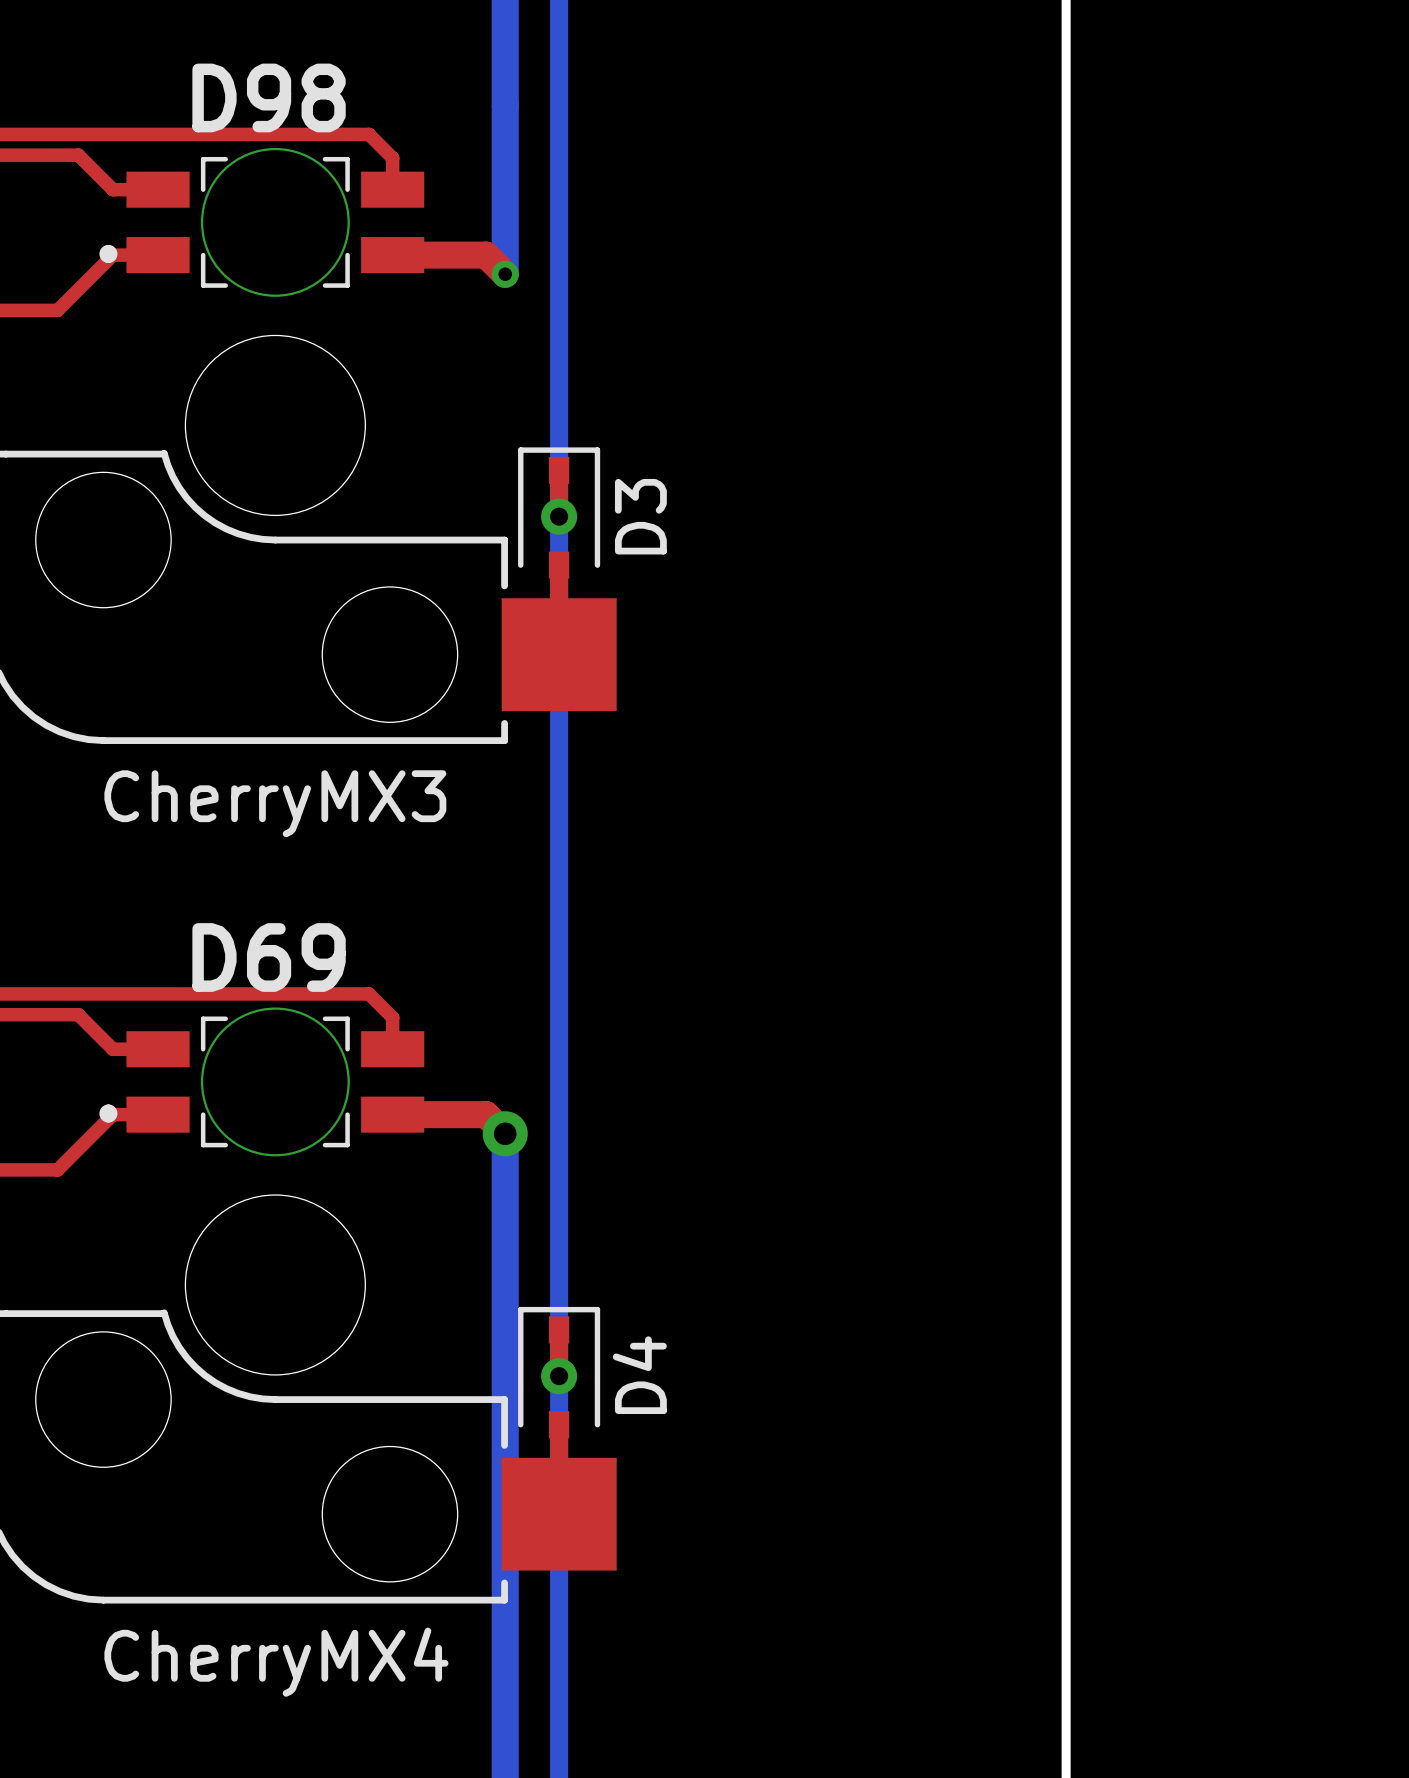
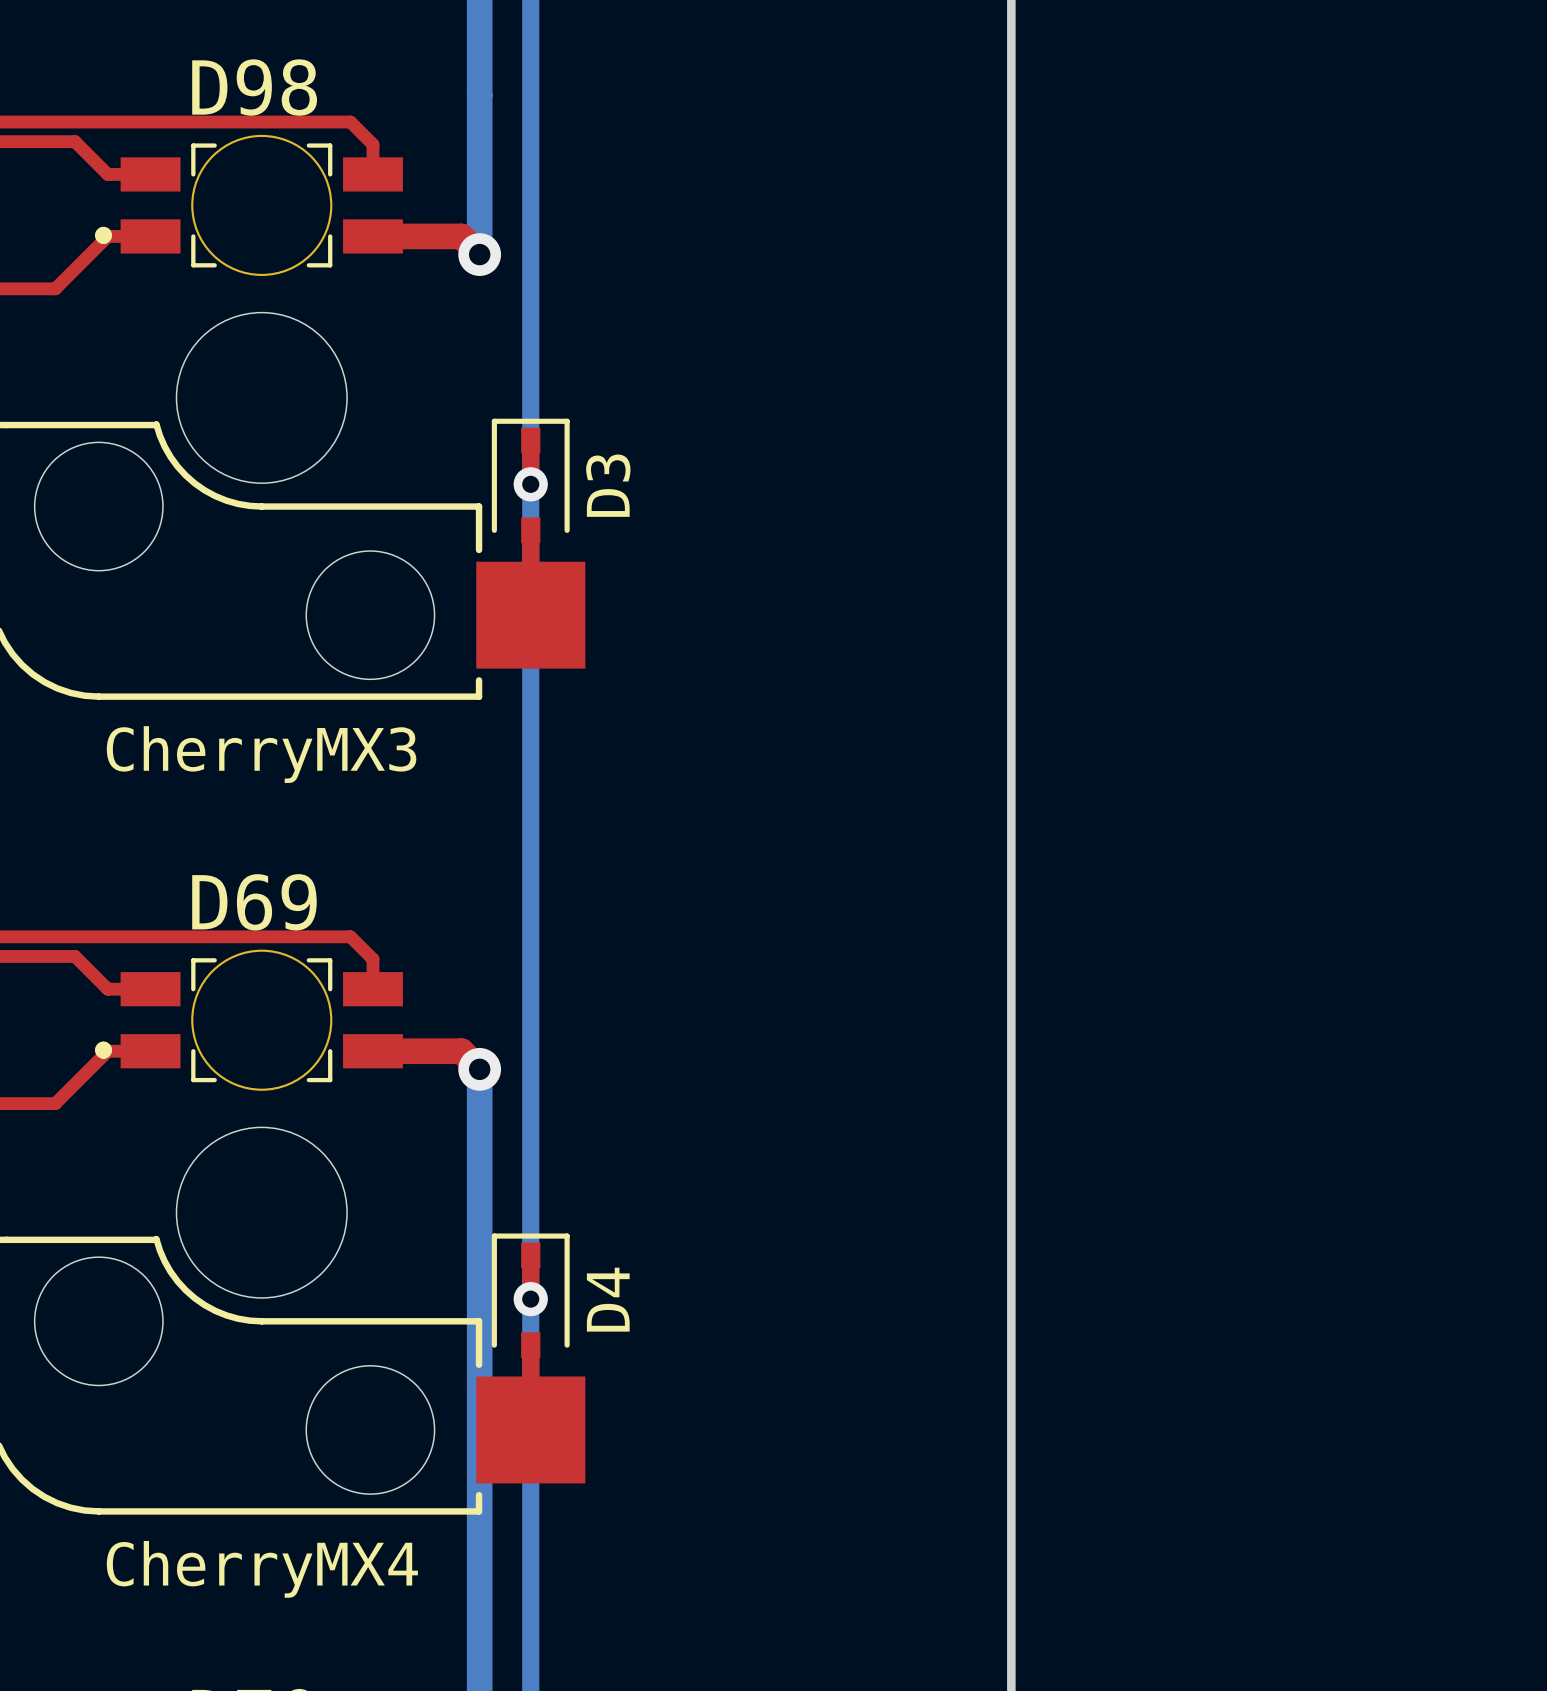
via size: [491, 260, 519, 288] -> [458, 233, 502, 276]

